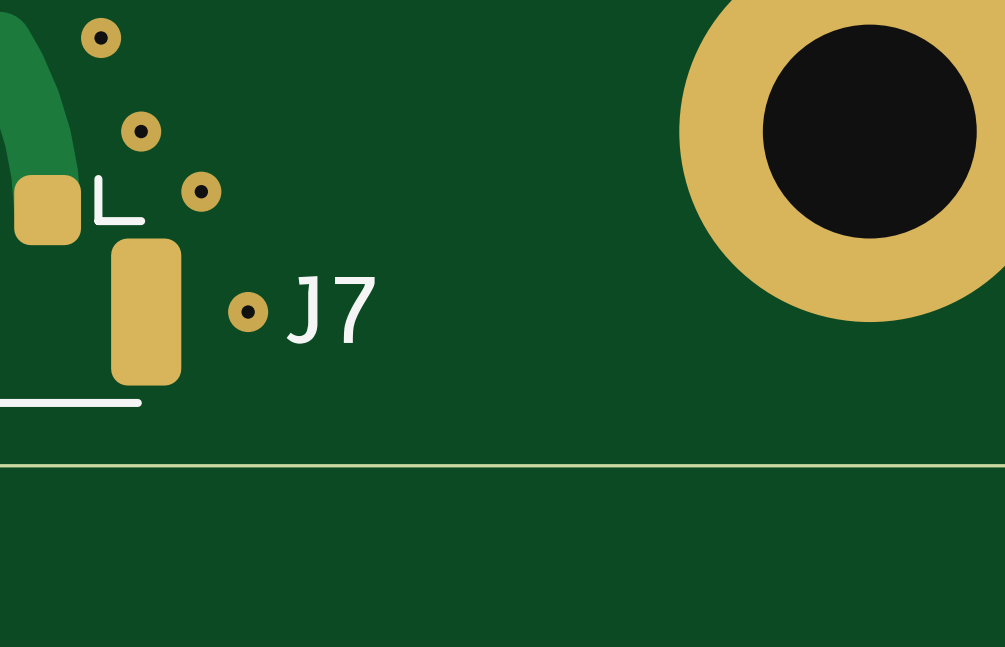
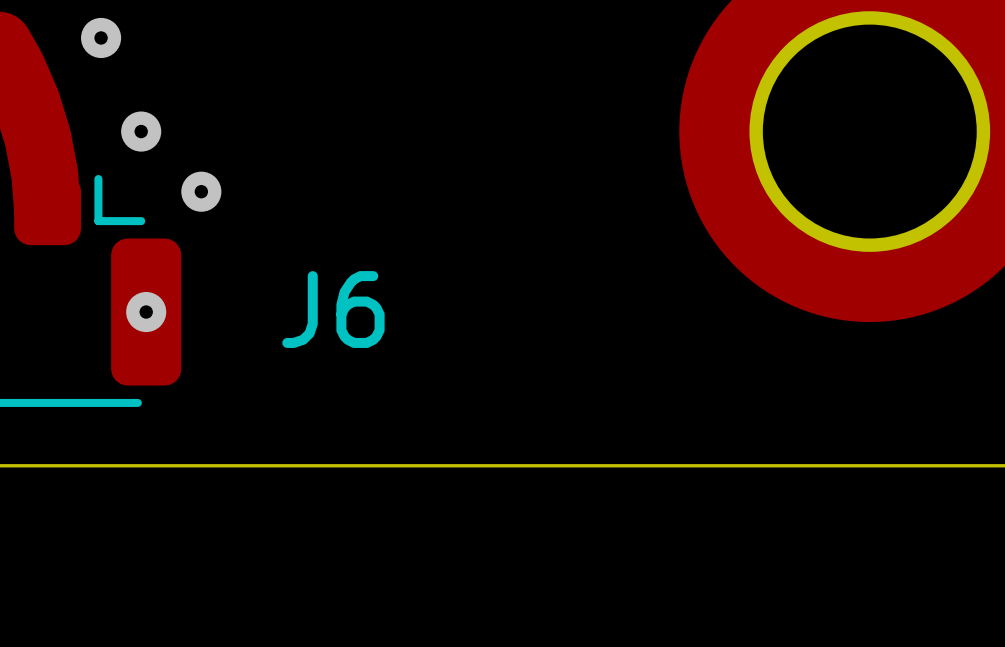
J7 name: J7 (330, 309) -> J6 (333, 309)
via position: (248, 312) -> (146, 312)

